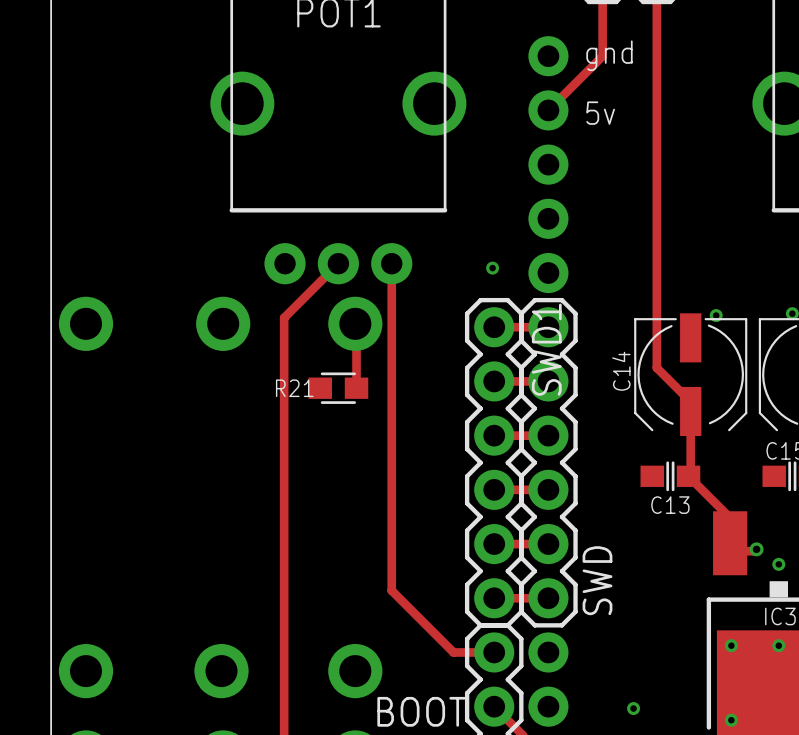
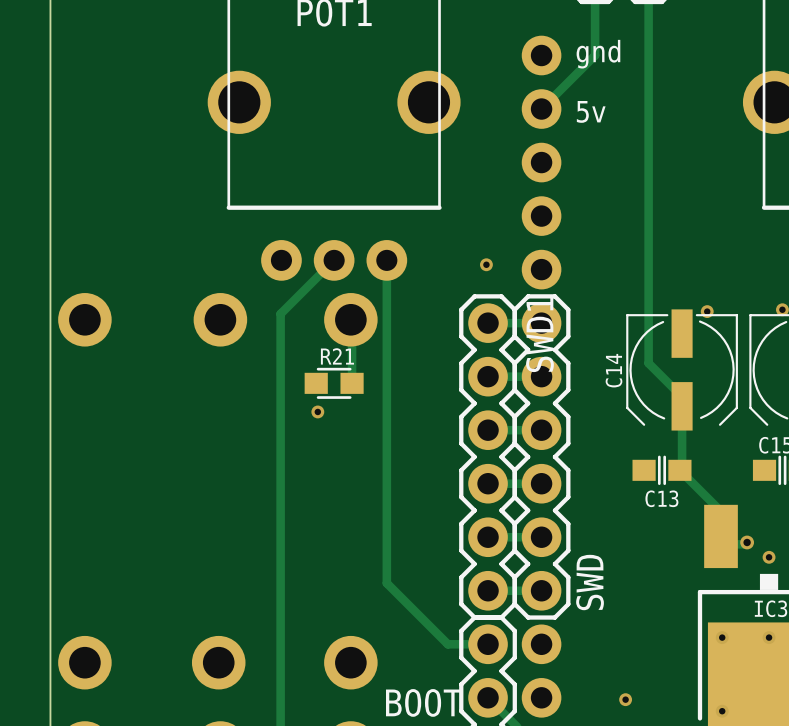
R21 name position: R21 (294, 388) -> R21 (337, 356)
via: none -> (317, 411)

